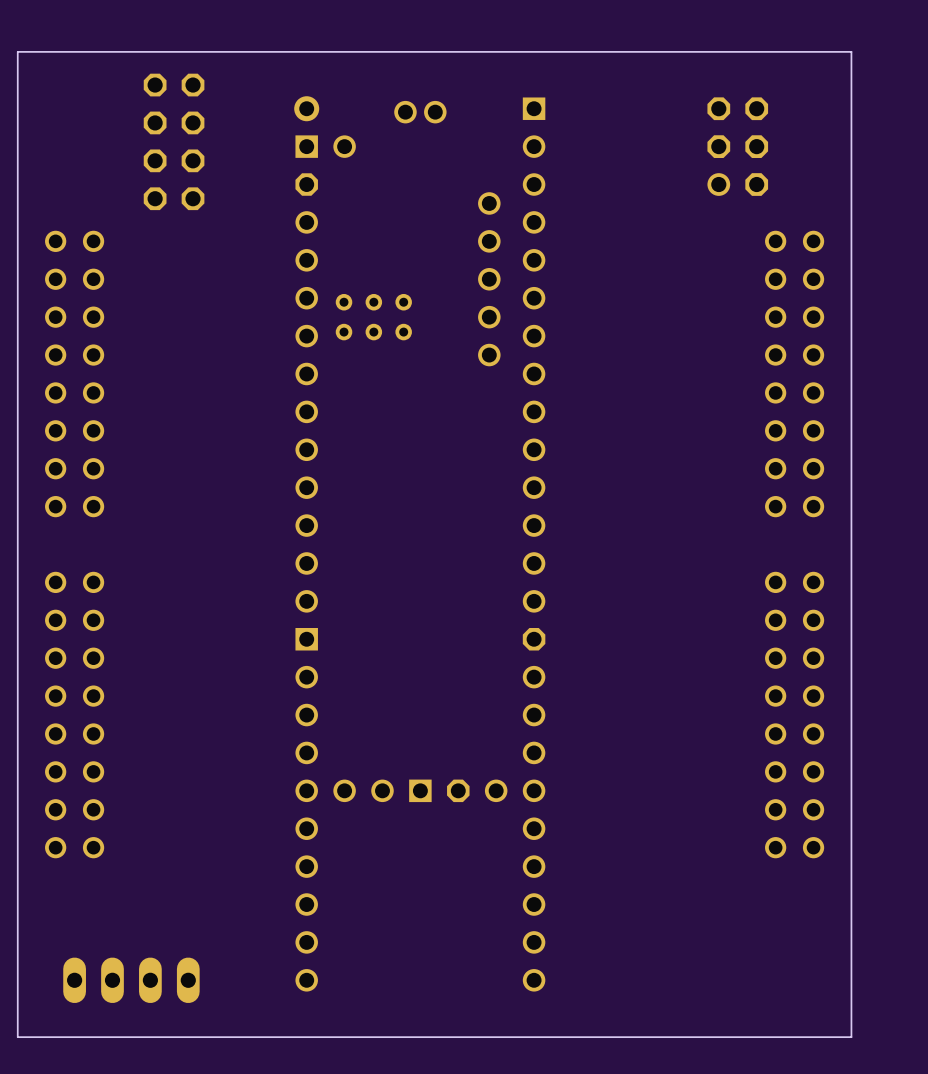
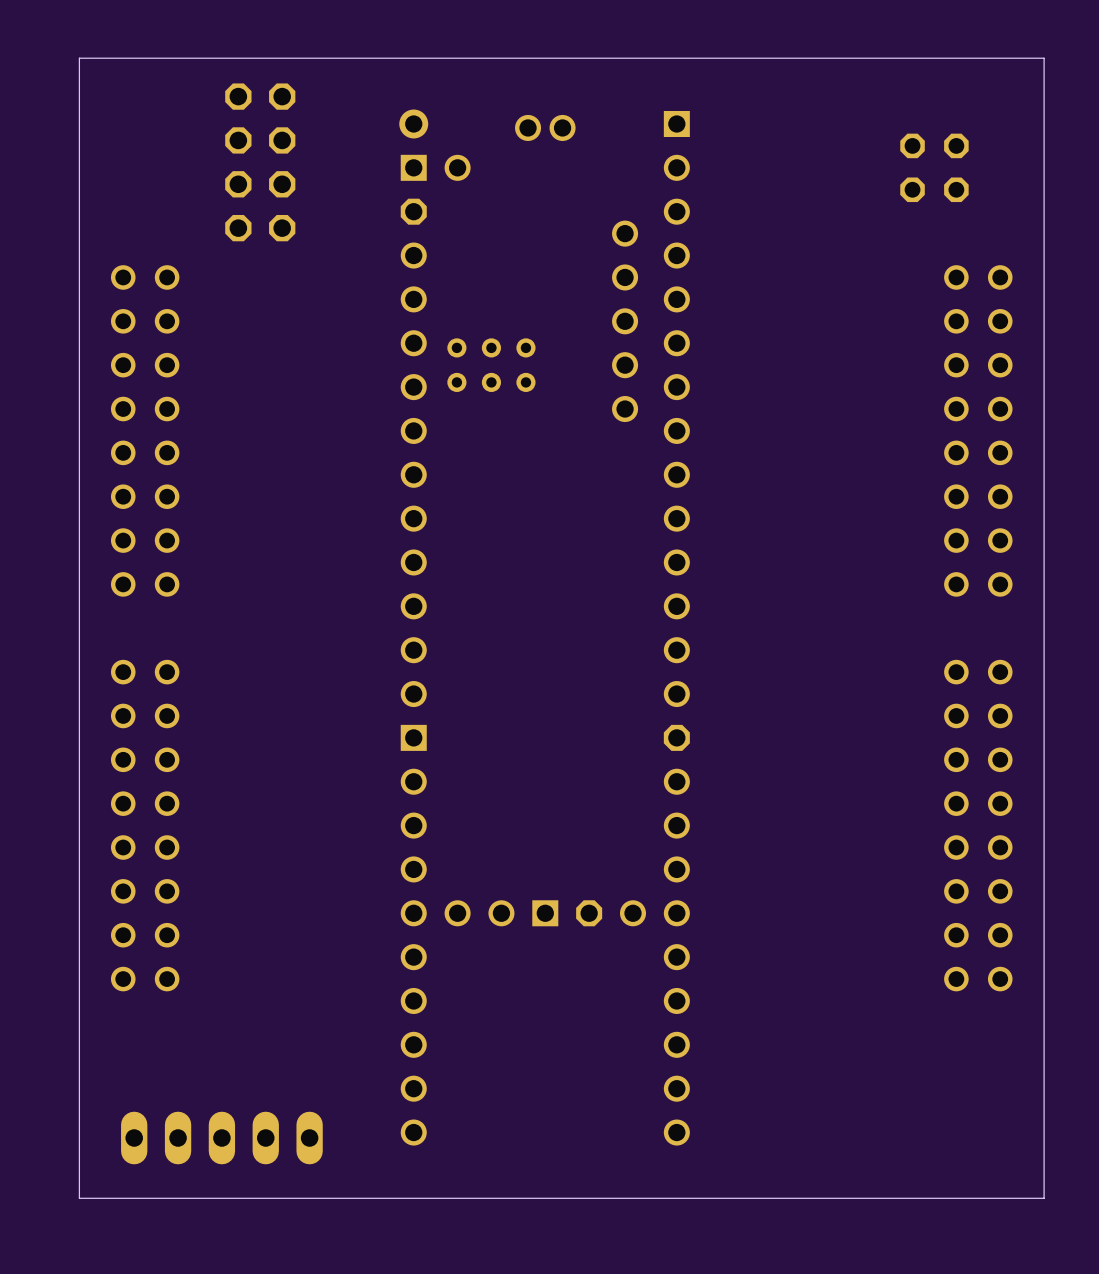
part: (737, 146) -> none
part: none -> (934, 167)
part footprint: [63, 957, 200, 1004] -> [121, 1111, 323, 1165]

